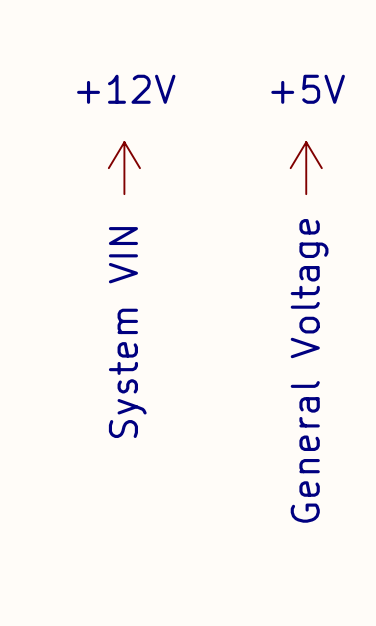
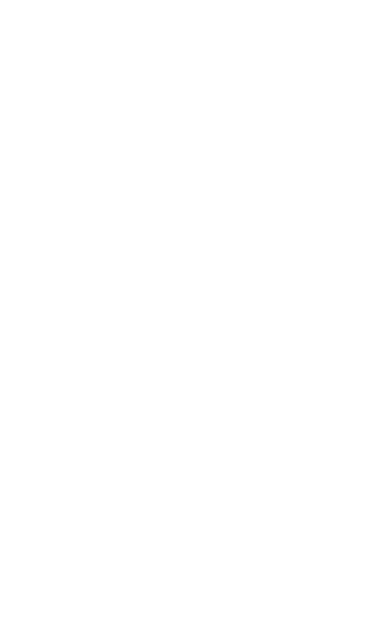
power symbol: +12V (124, 168) -> none
power symbol: +5V (306, 168) -> none
text: System VIN (127, 332) -> none
text: General Voltage (309, 370) -> none

